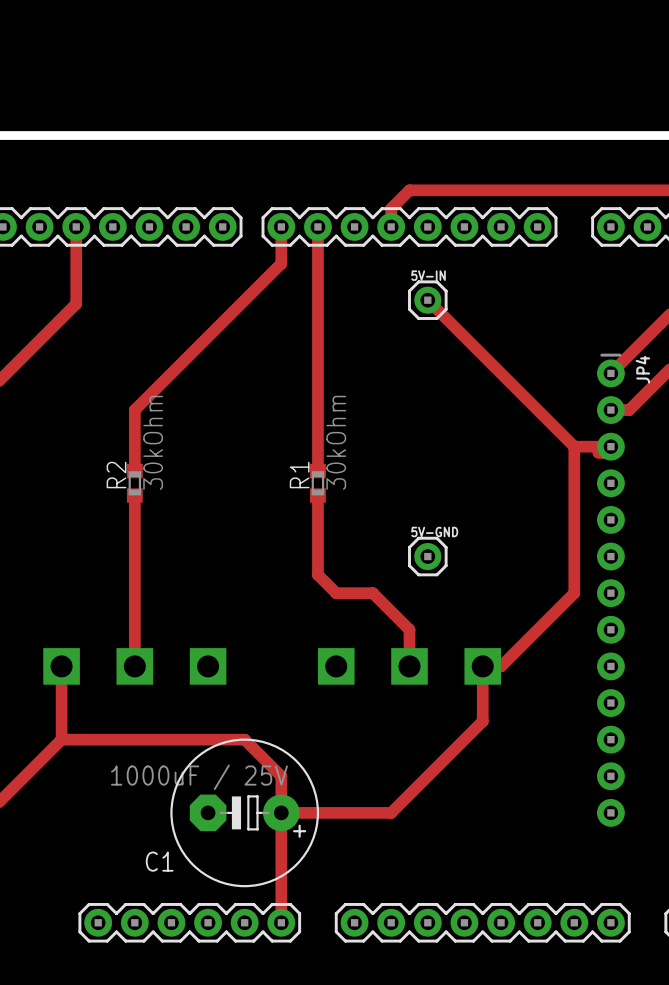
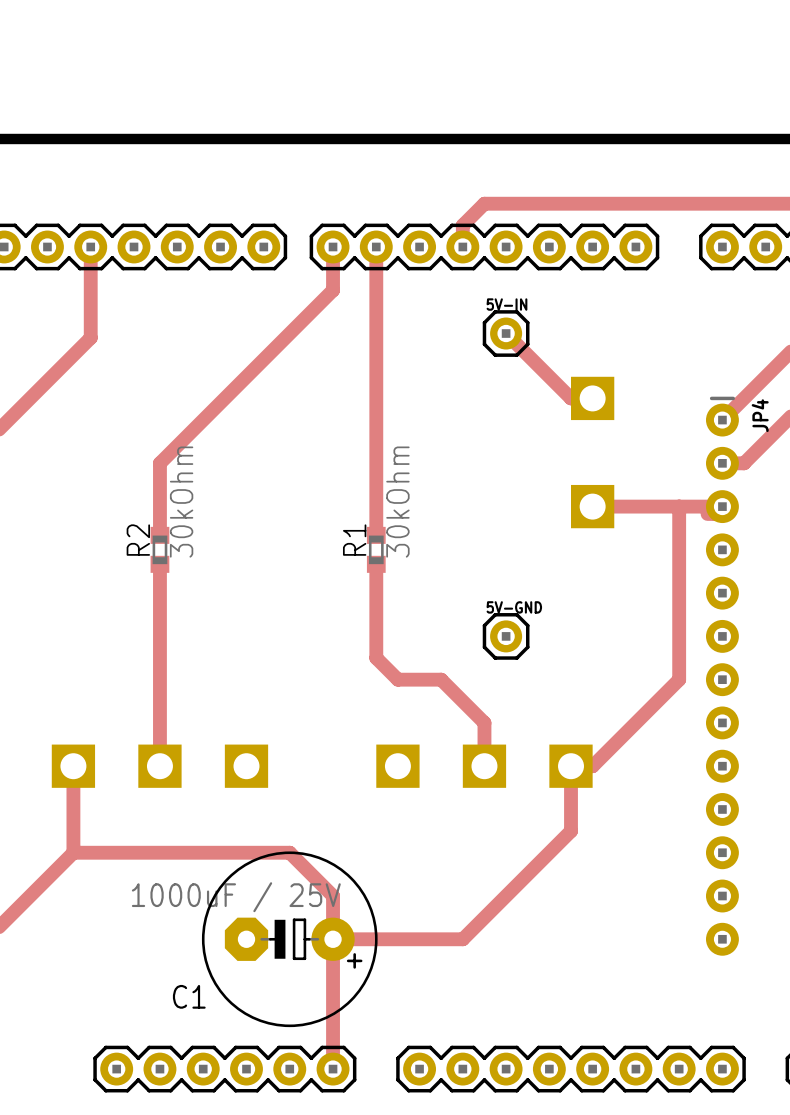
top track: (482, 355) (574, 446) -> (592, 506) (679, 506)
part: none -> (592, 398)
part: none -> (592, 506)

